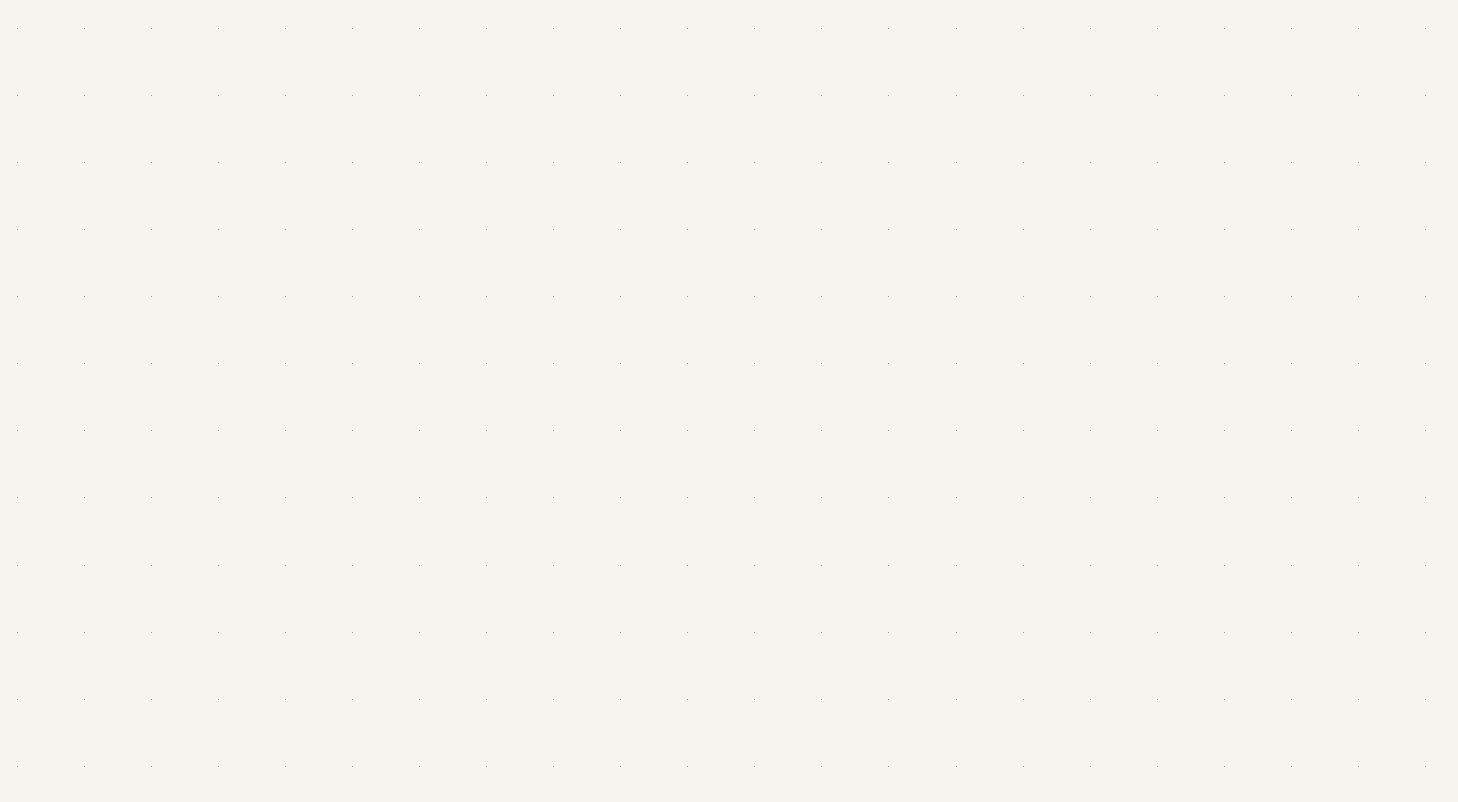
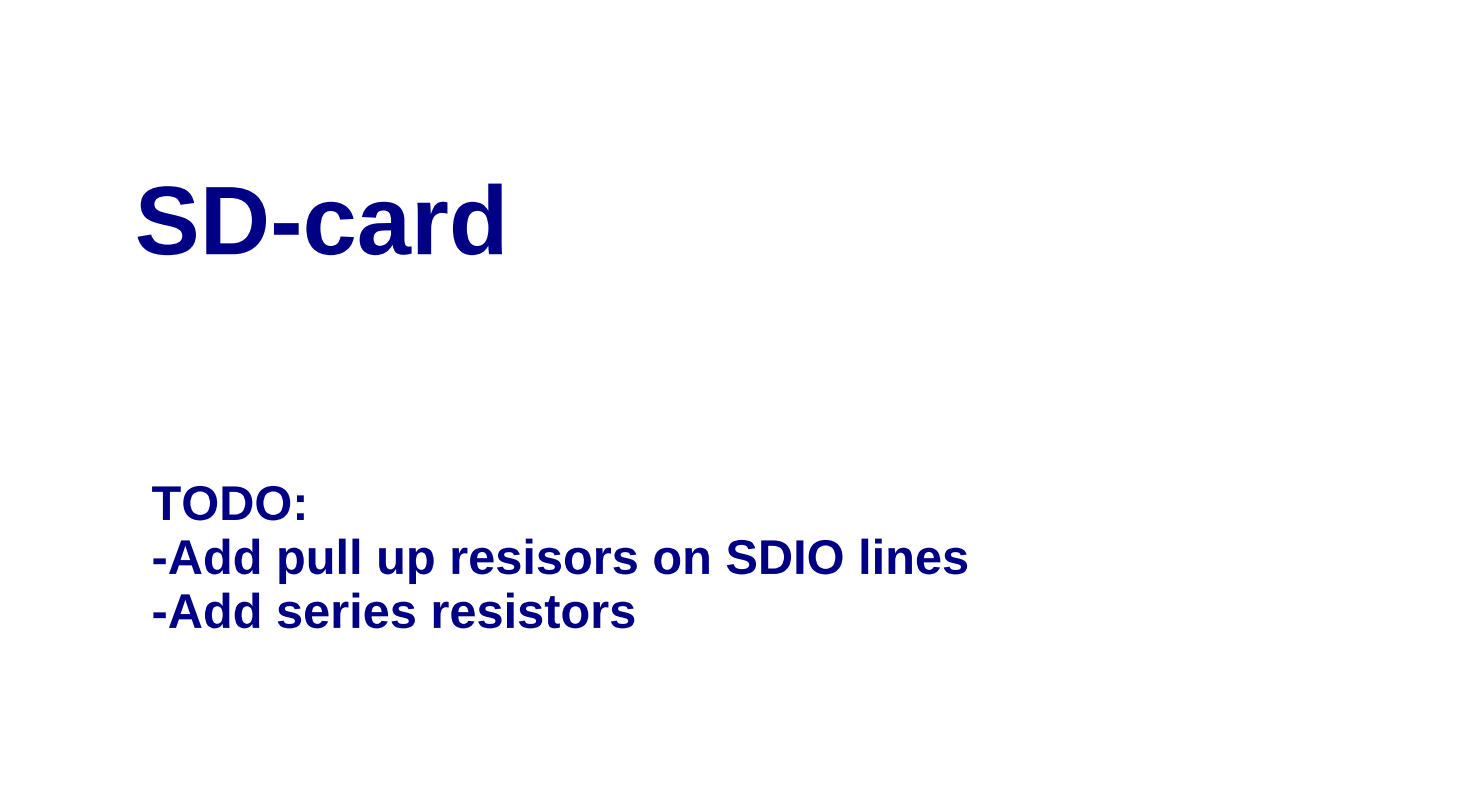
text: none -> SD-card (319, 219)
text: none -> TODO: (227, 503)
text: none -> -Add pull up resisors on SDIO lines (560, 561)
text: none -> -Add series resistors (393, 610)

